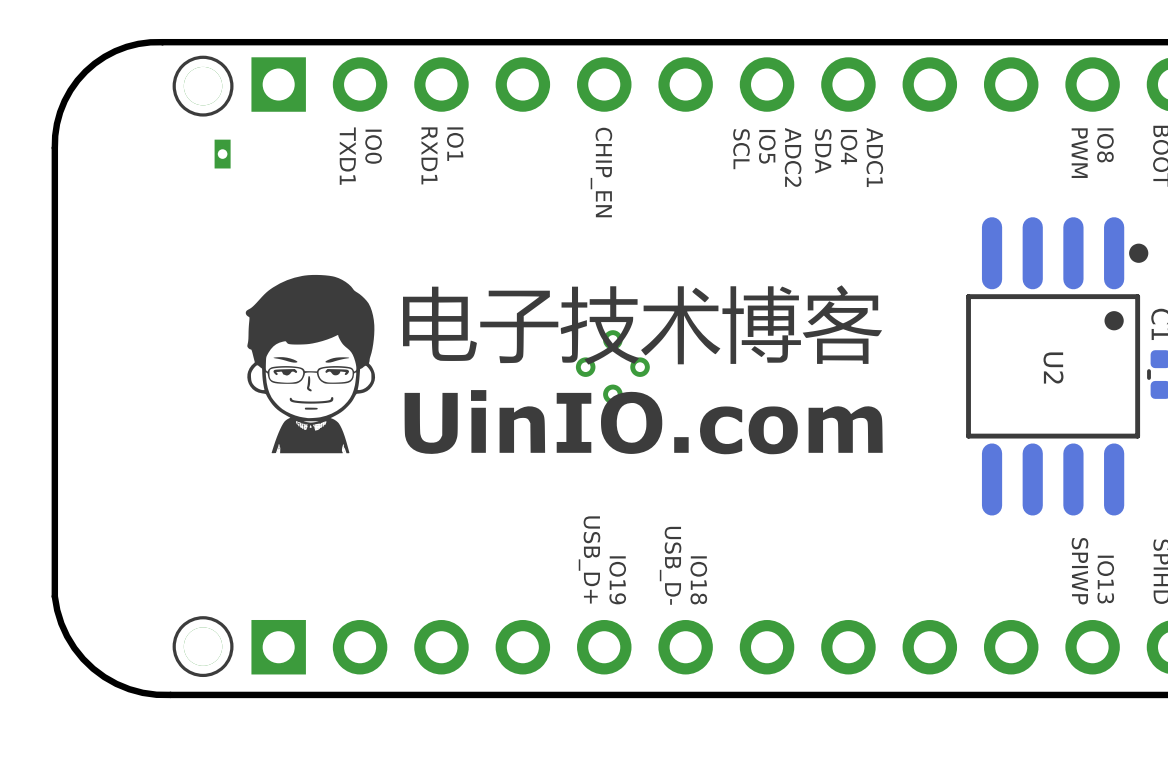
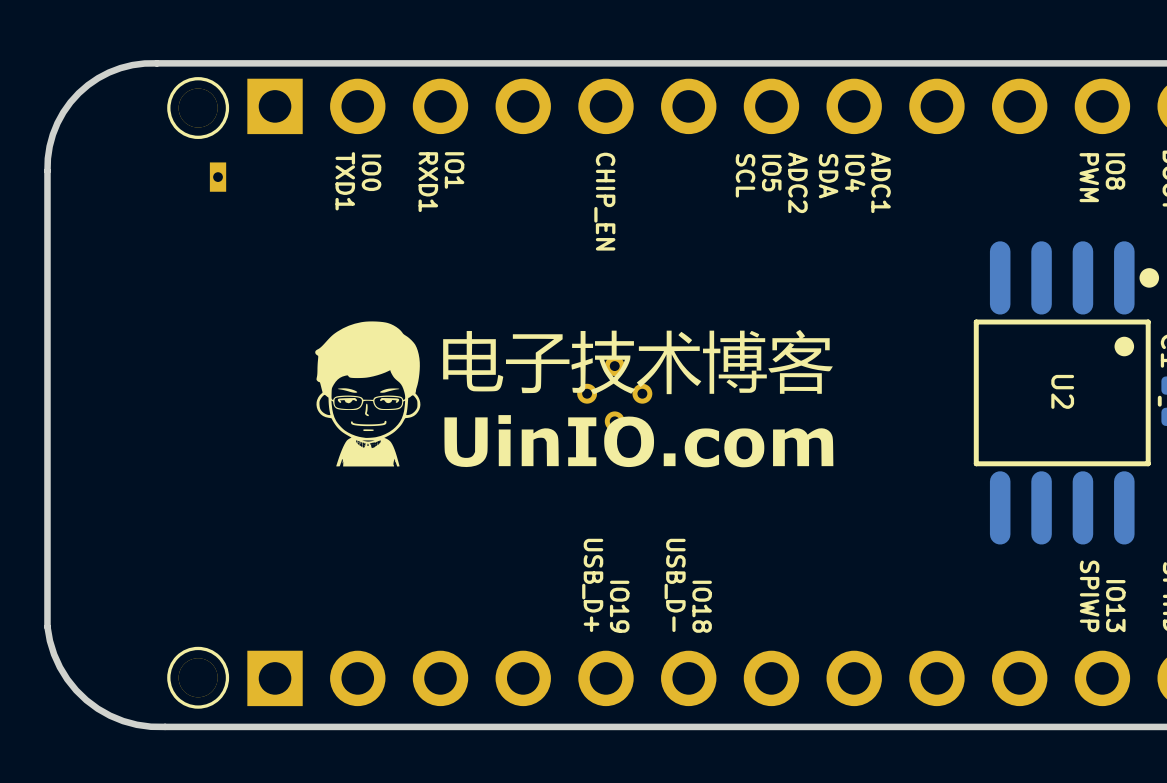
drawing shape: [245, 274, 883, 455] -> [315, 321, 834, 468]

